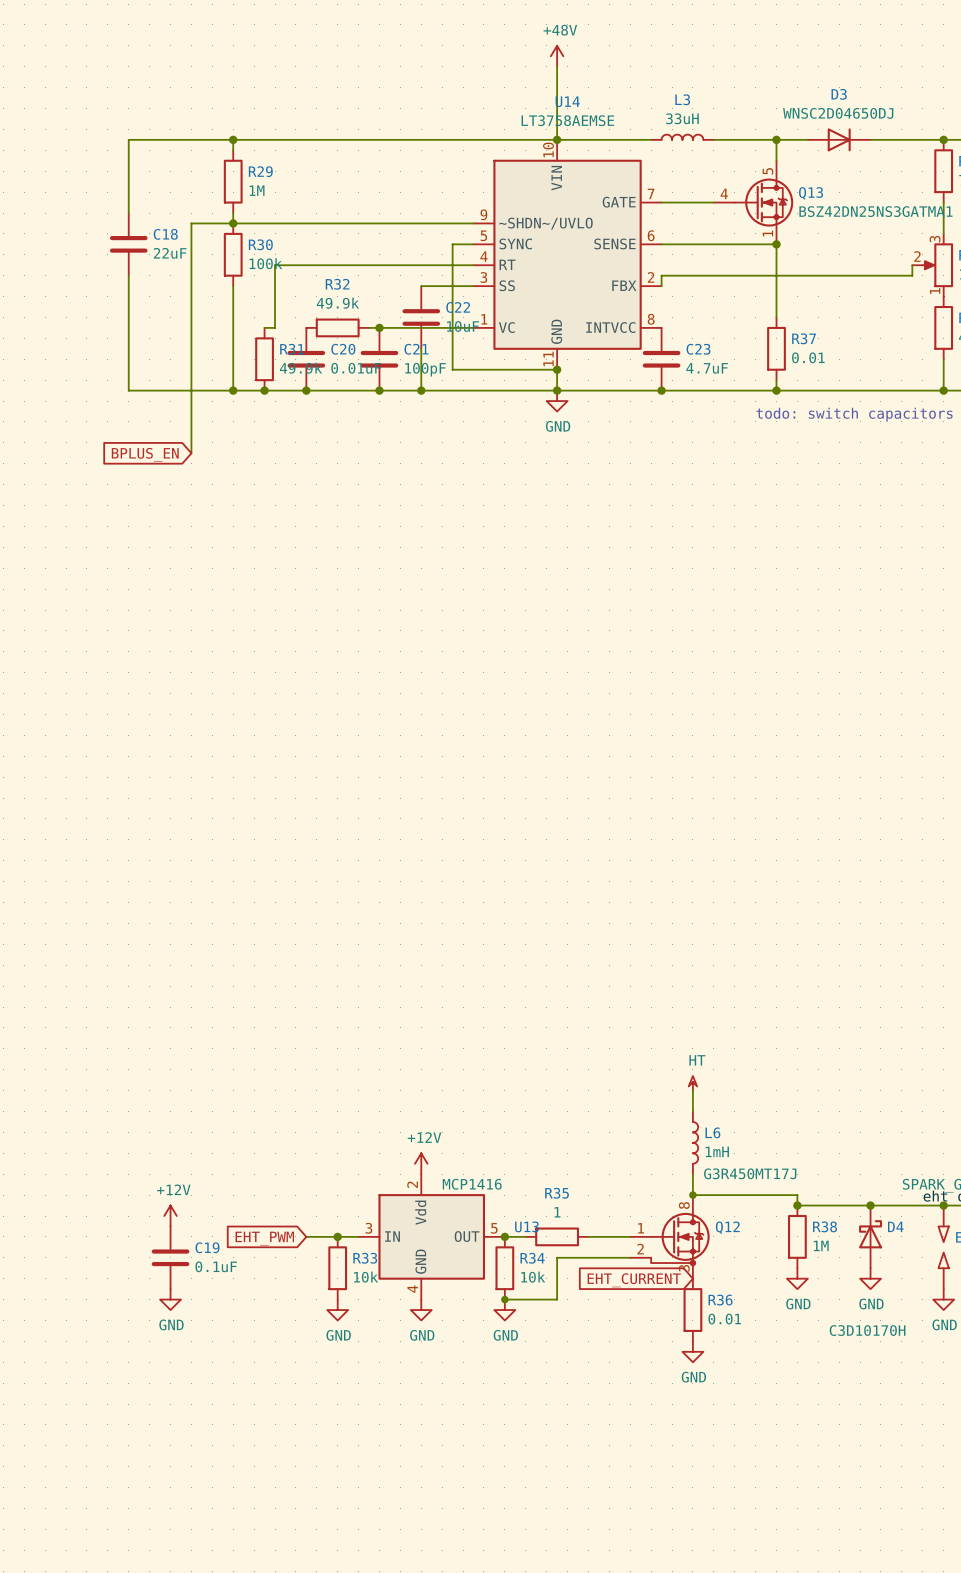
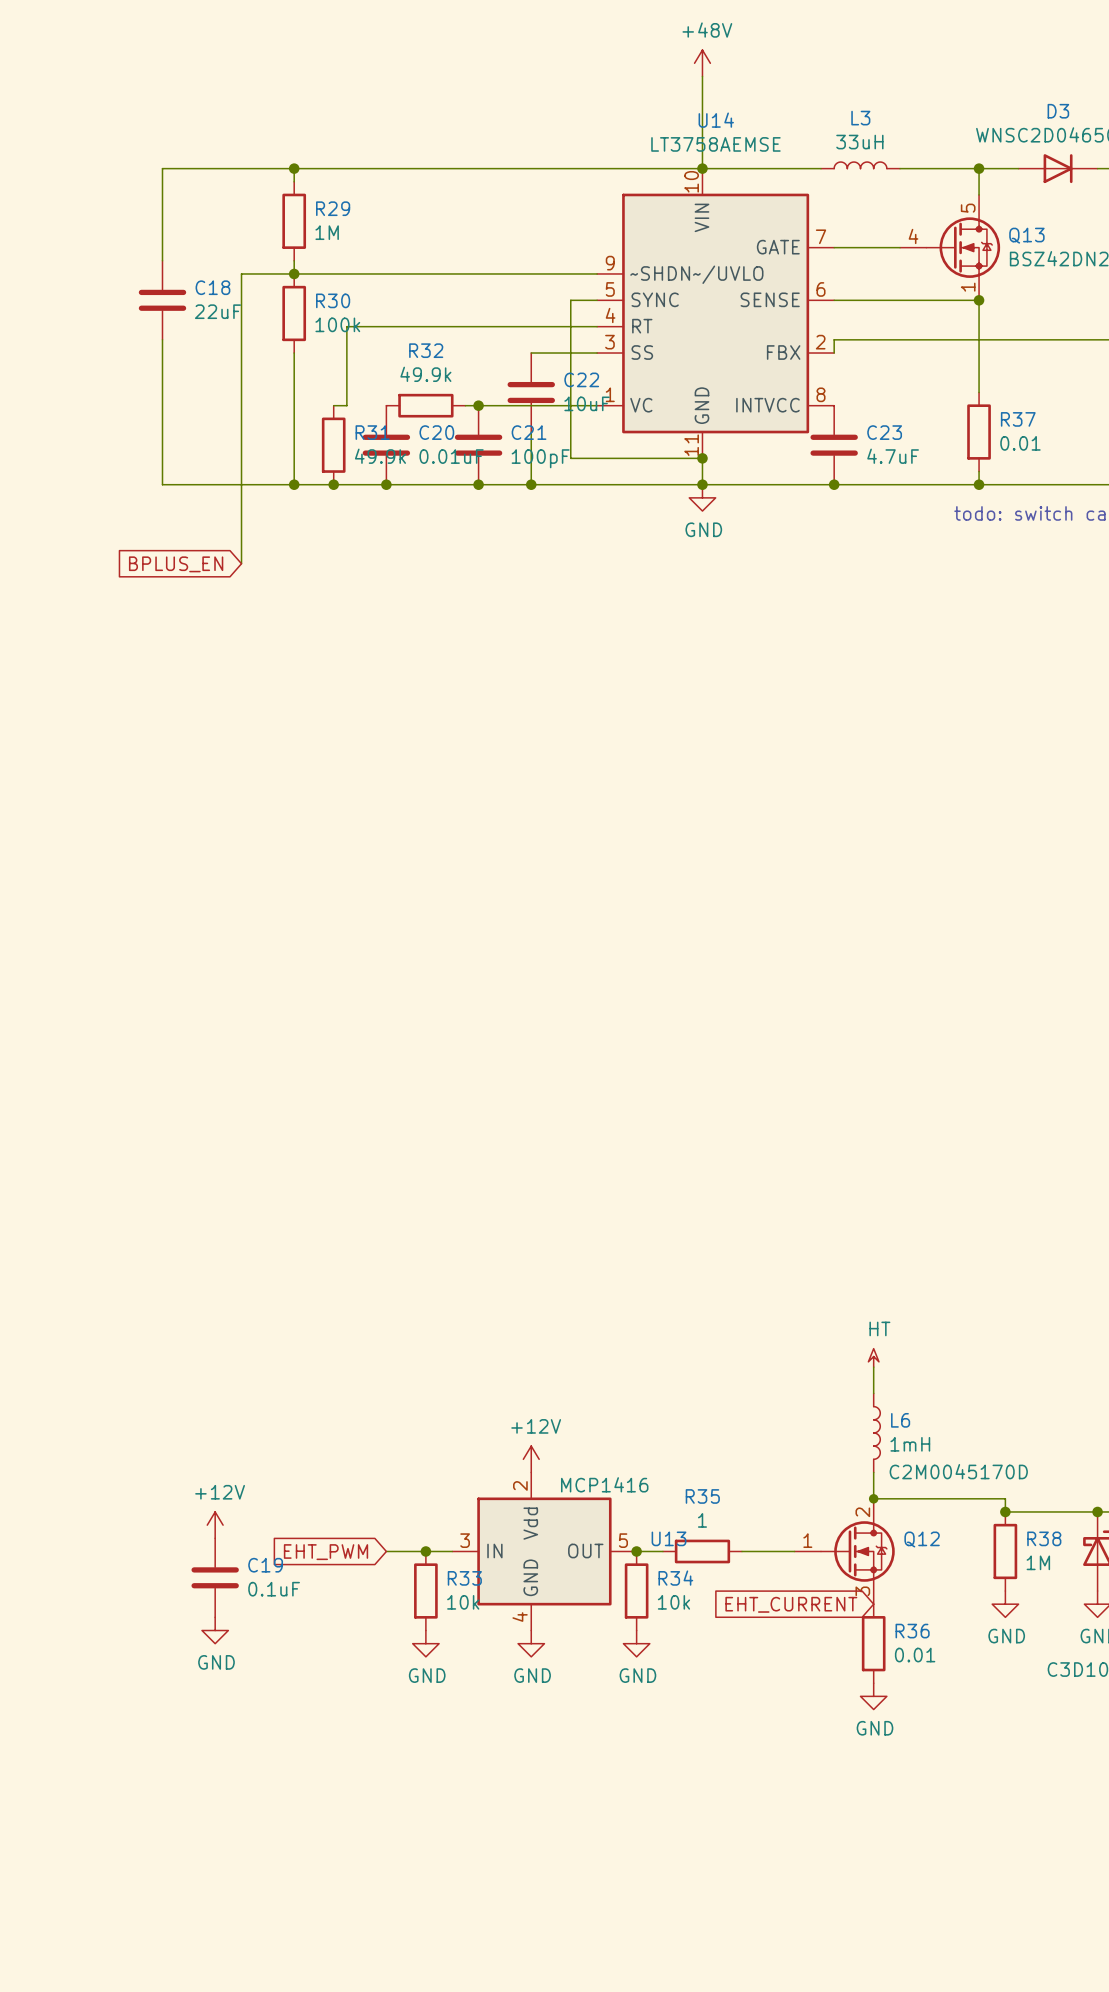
Q12 value: G3R450MT17J (750, 1173) -> C2M0045170D (958, 1471)
Q12 symbol: [630, 1195, 710, 1279] -> [794, 1498, 895, 1605]
wire: (630, 1257) (557, 1257) (557, 1299) (504, 1299) -> none
junction: (504, 1299) -> none

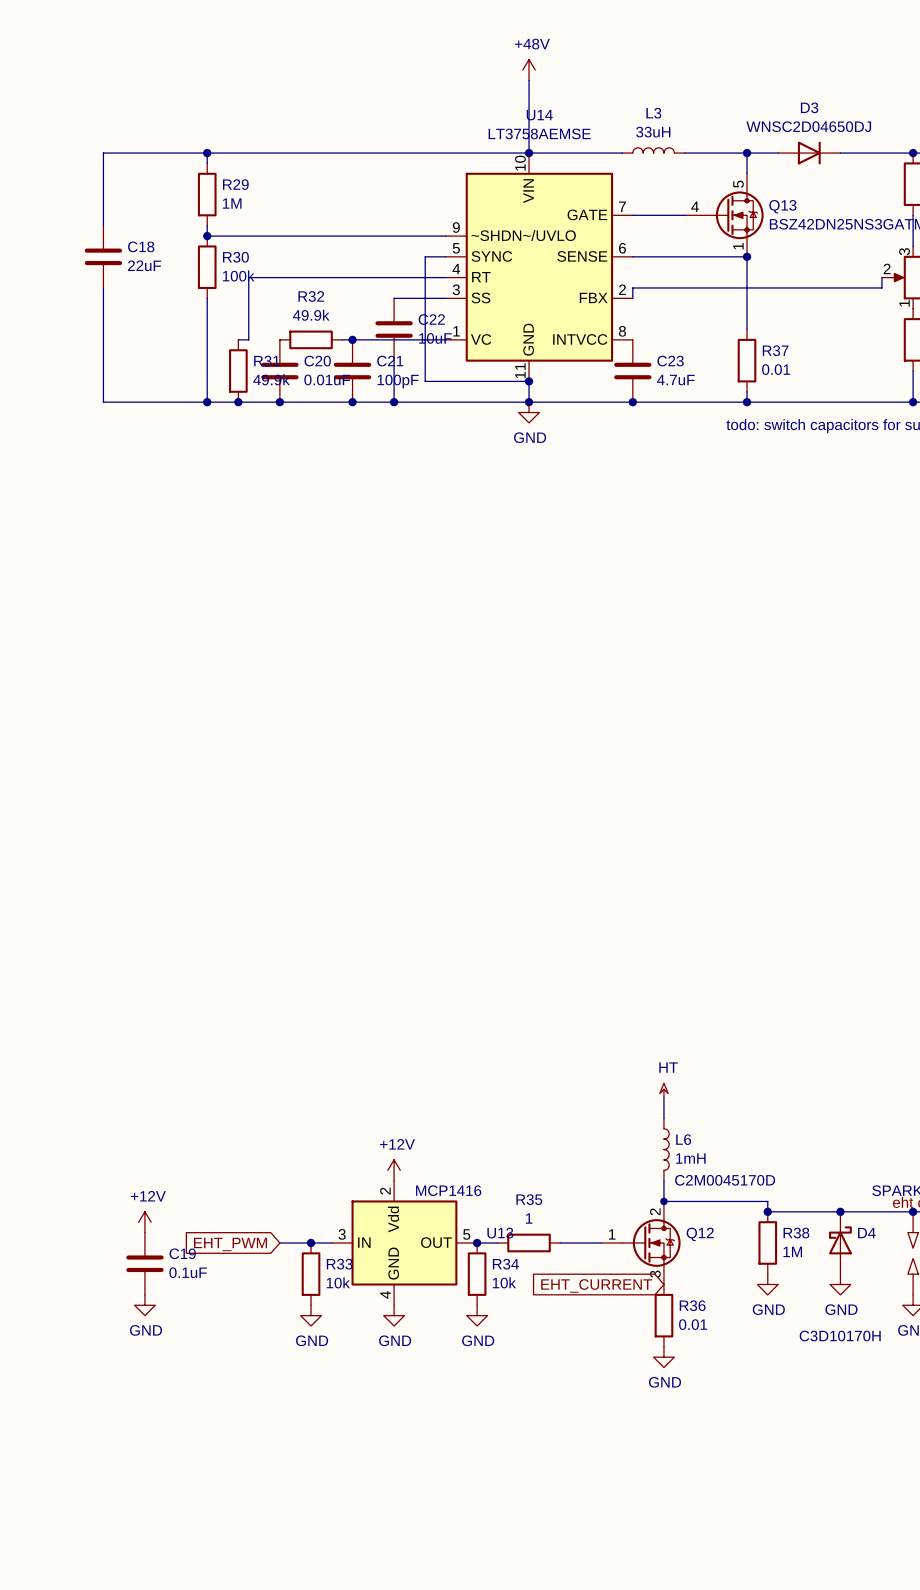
wire: (294, 273) (241, 273) (241, 563) -> none
global label: BPLUS_EN (176, 564) -> none

